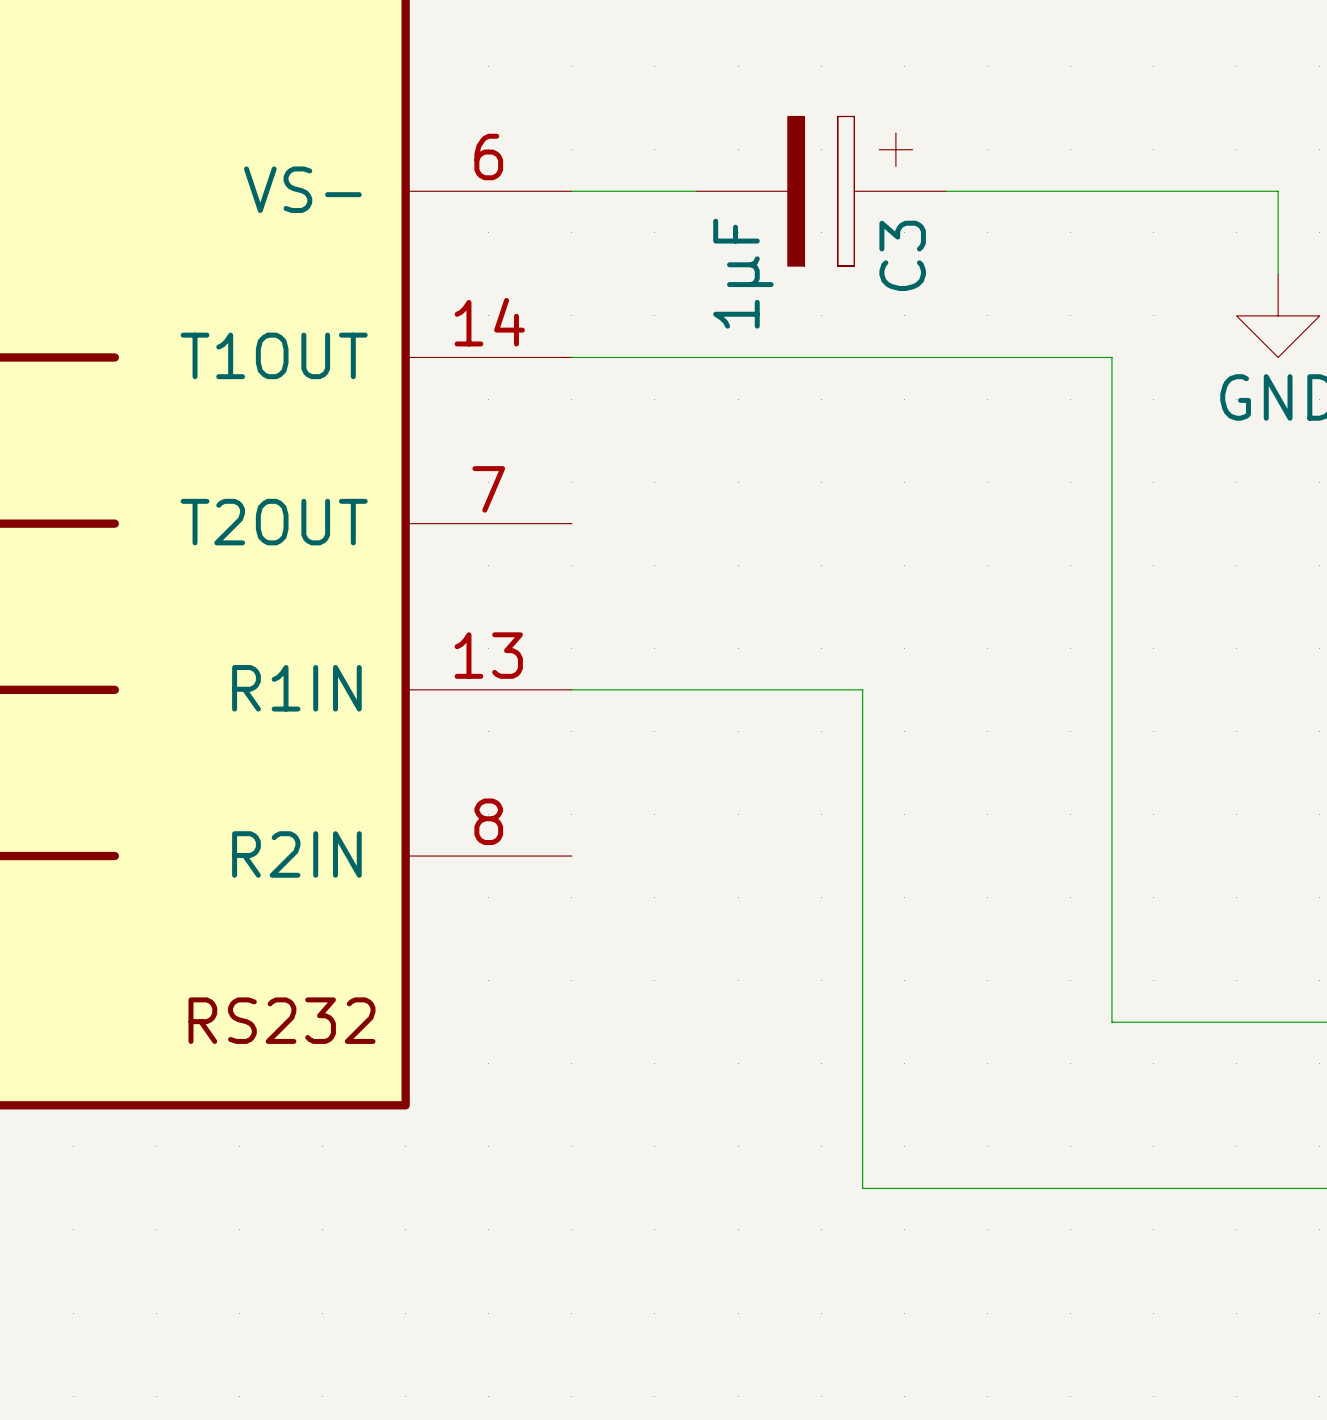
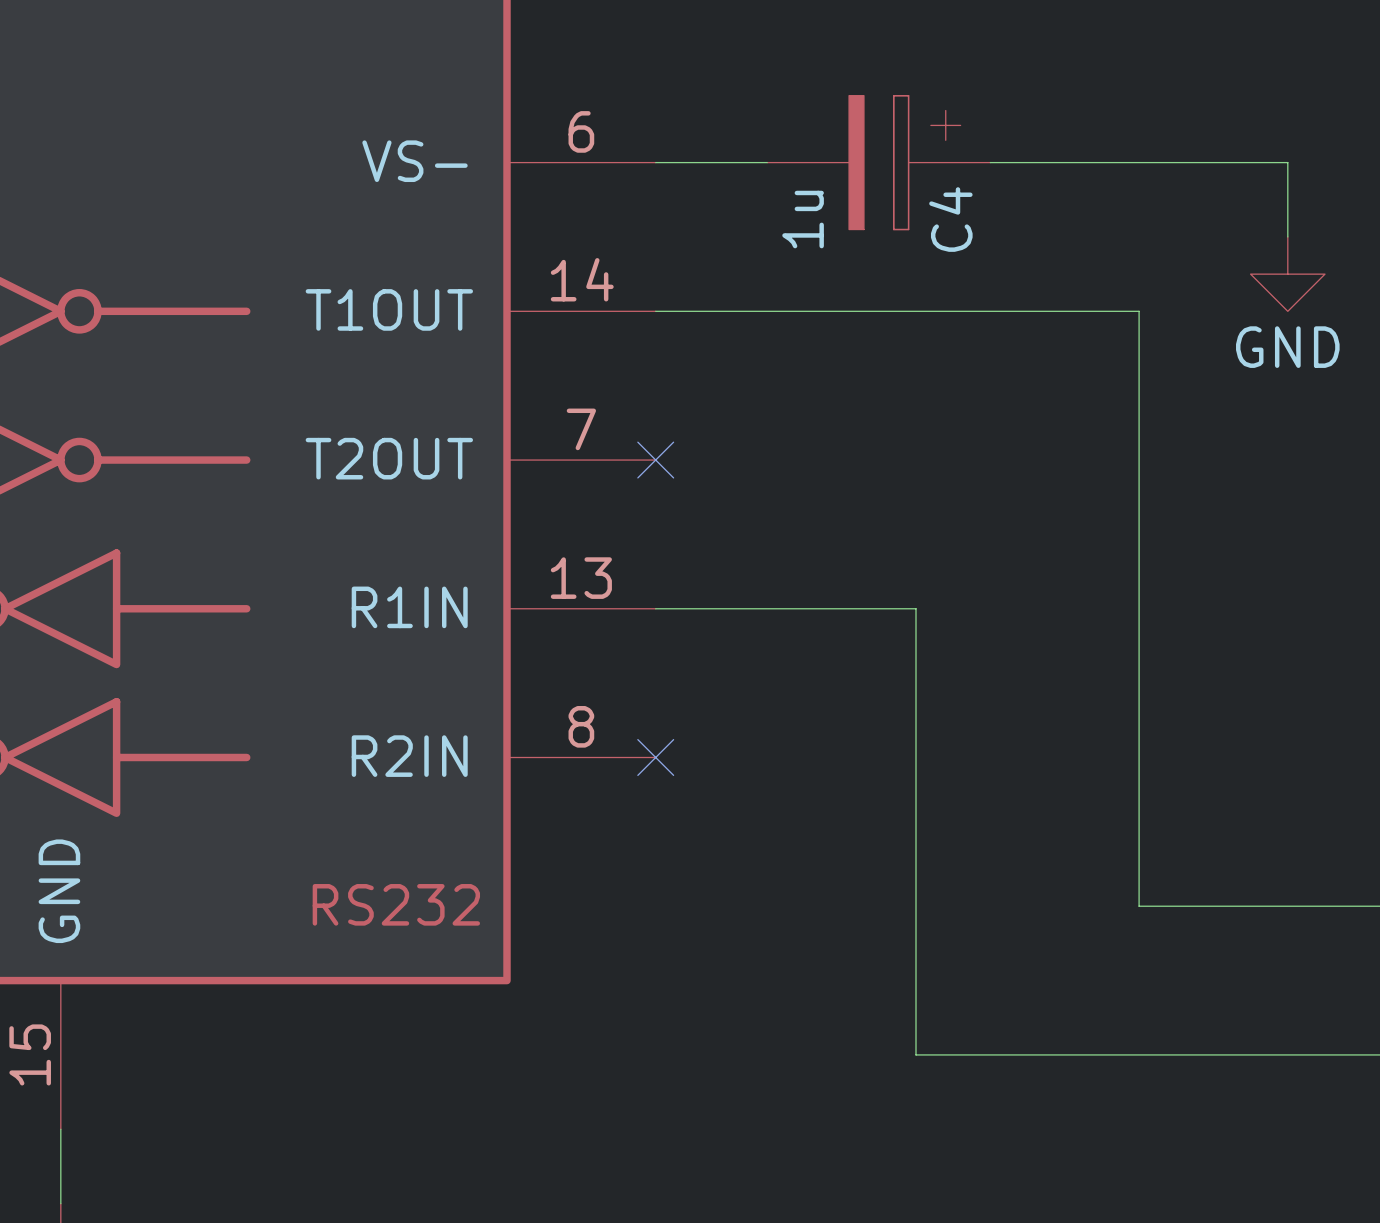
C3 name: C3 (902, 255) -> C4 (950, 219)
C3 value: 1µF (743, 273) -> 1u (803, 219)
no-connect mark: none -> (655, 460)
no-connect mark: none -> (655, 757)

